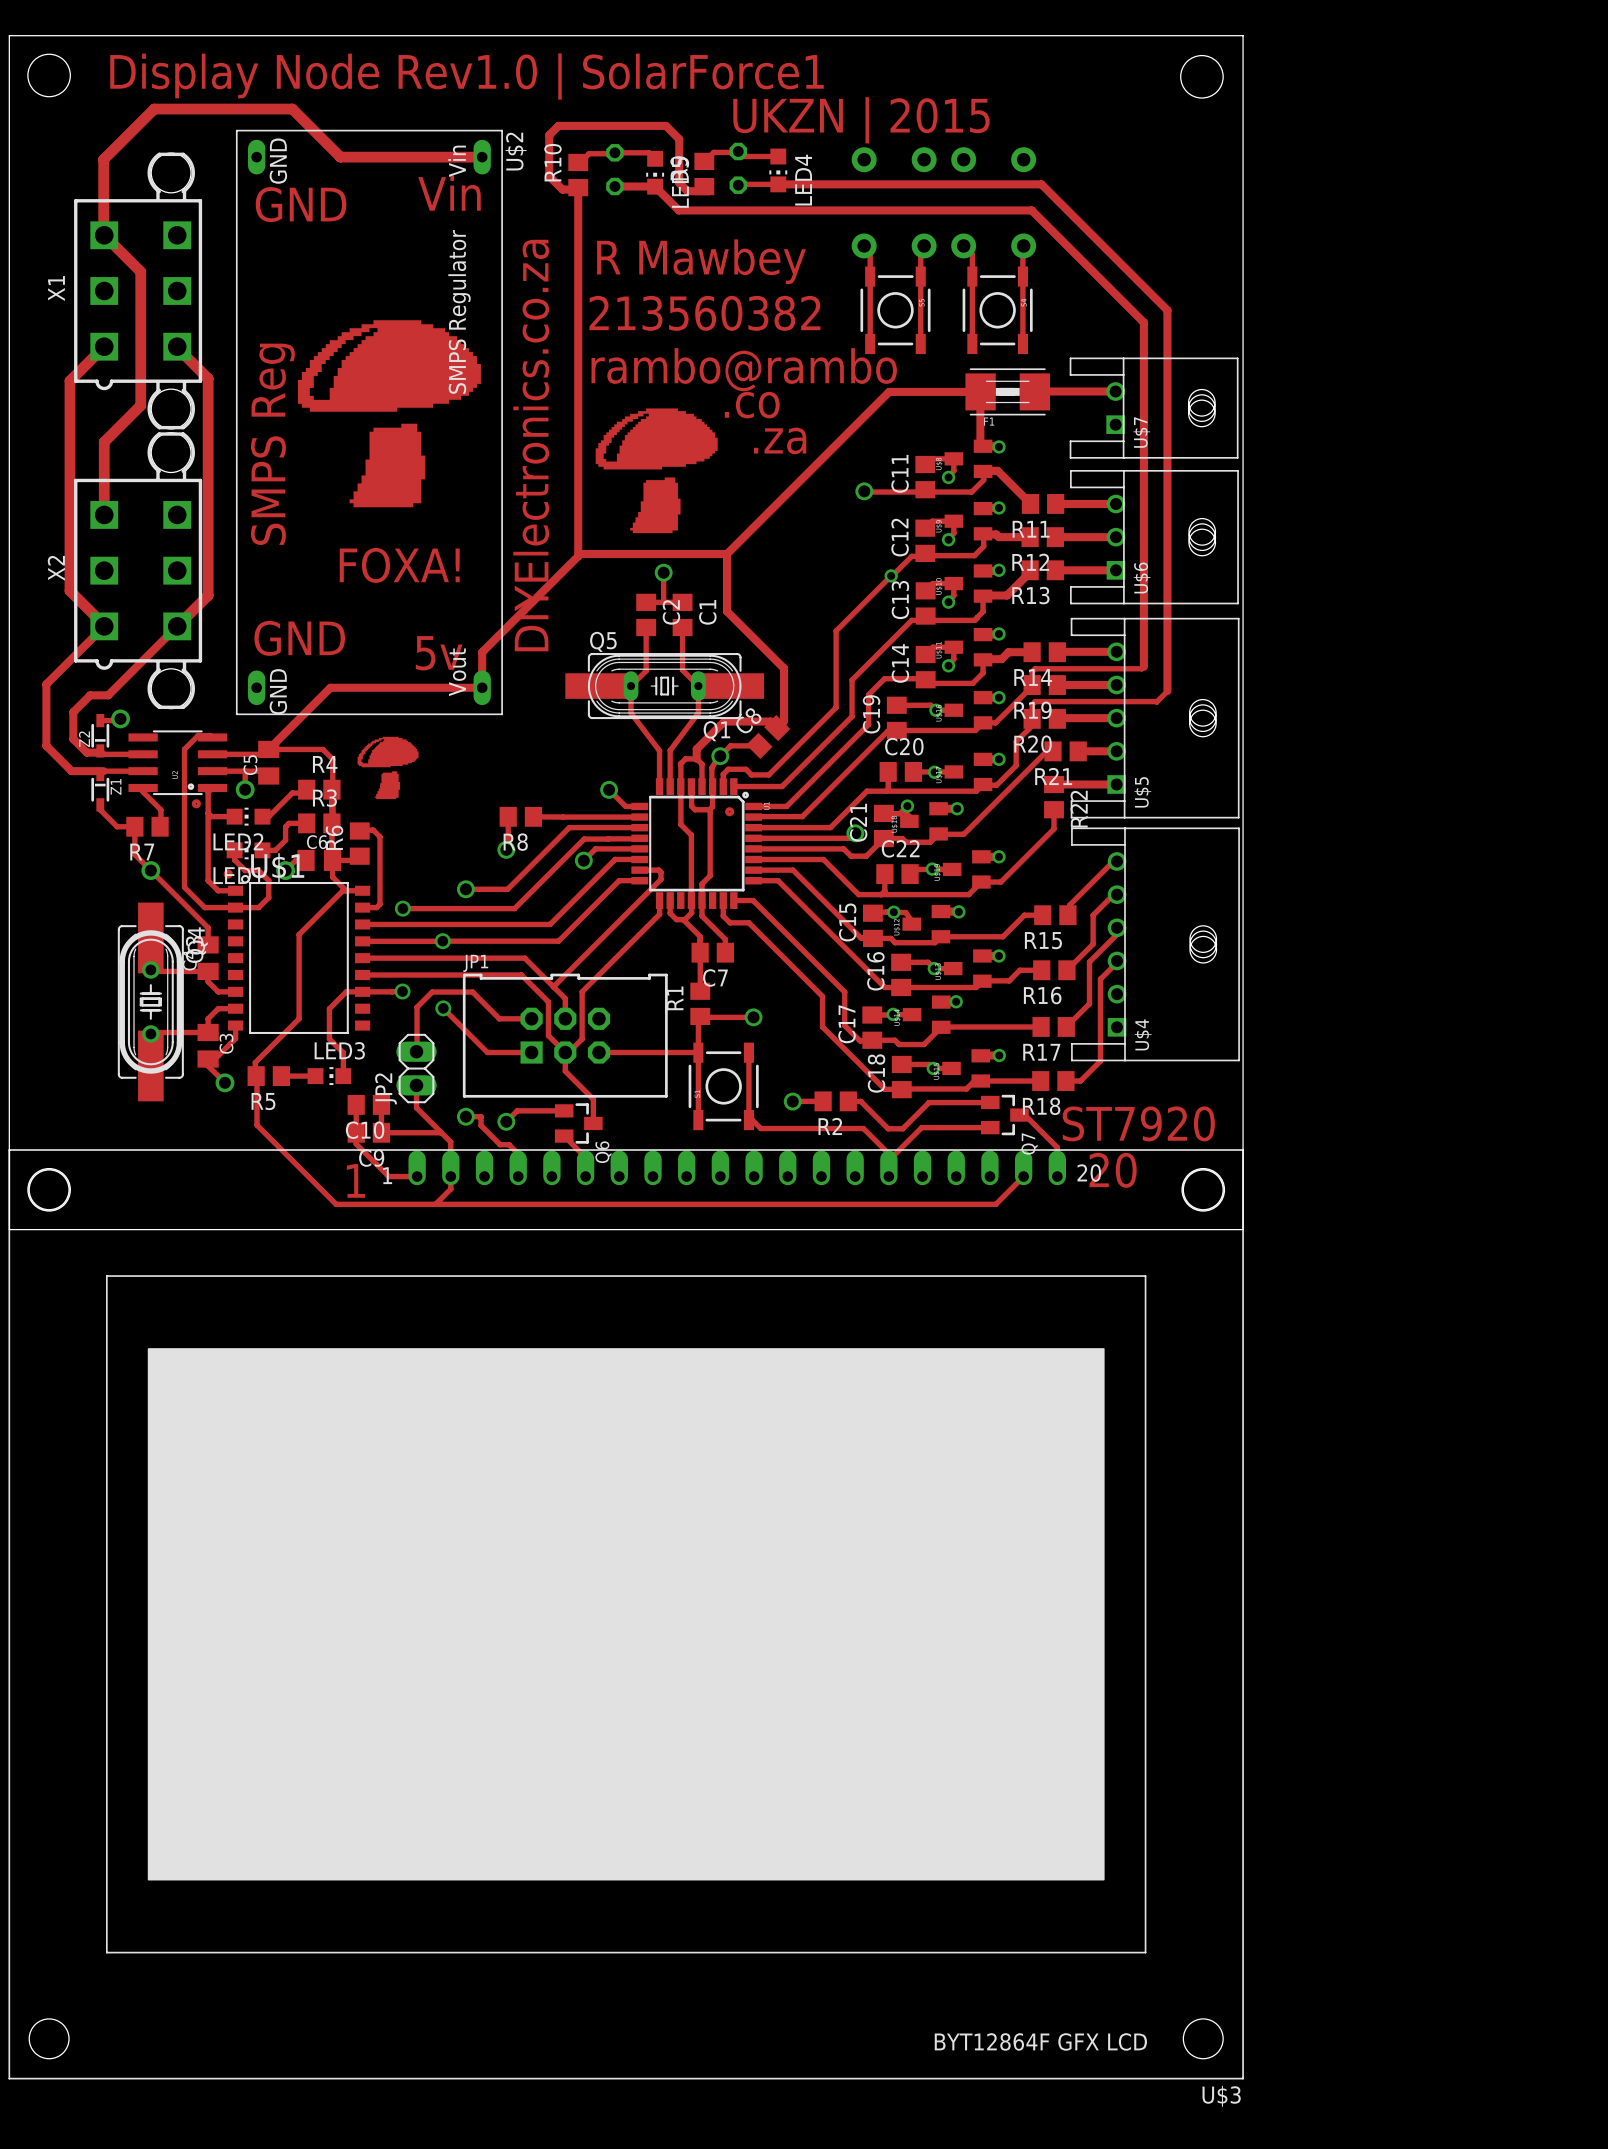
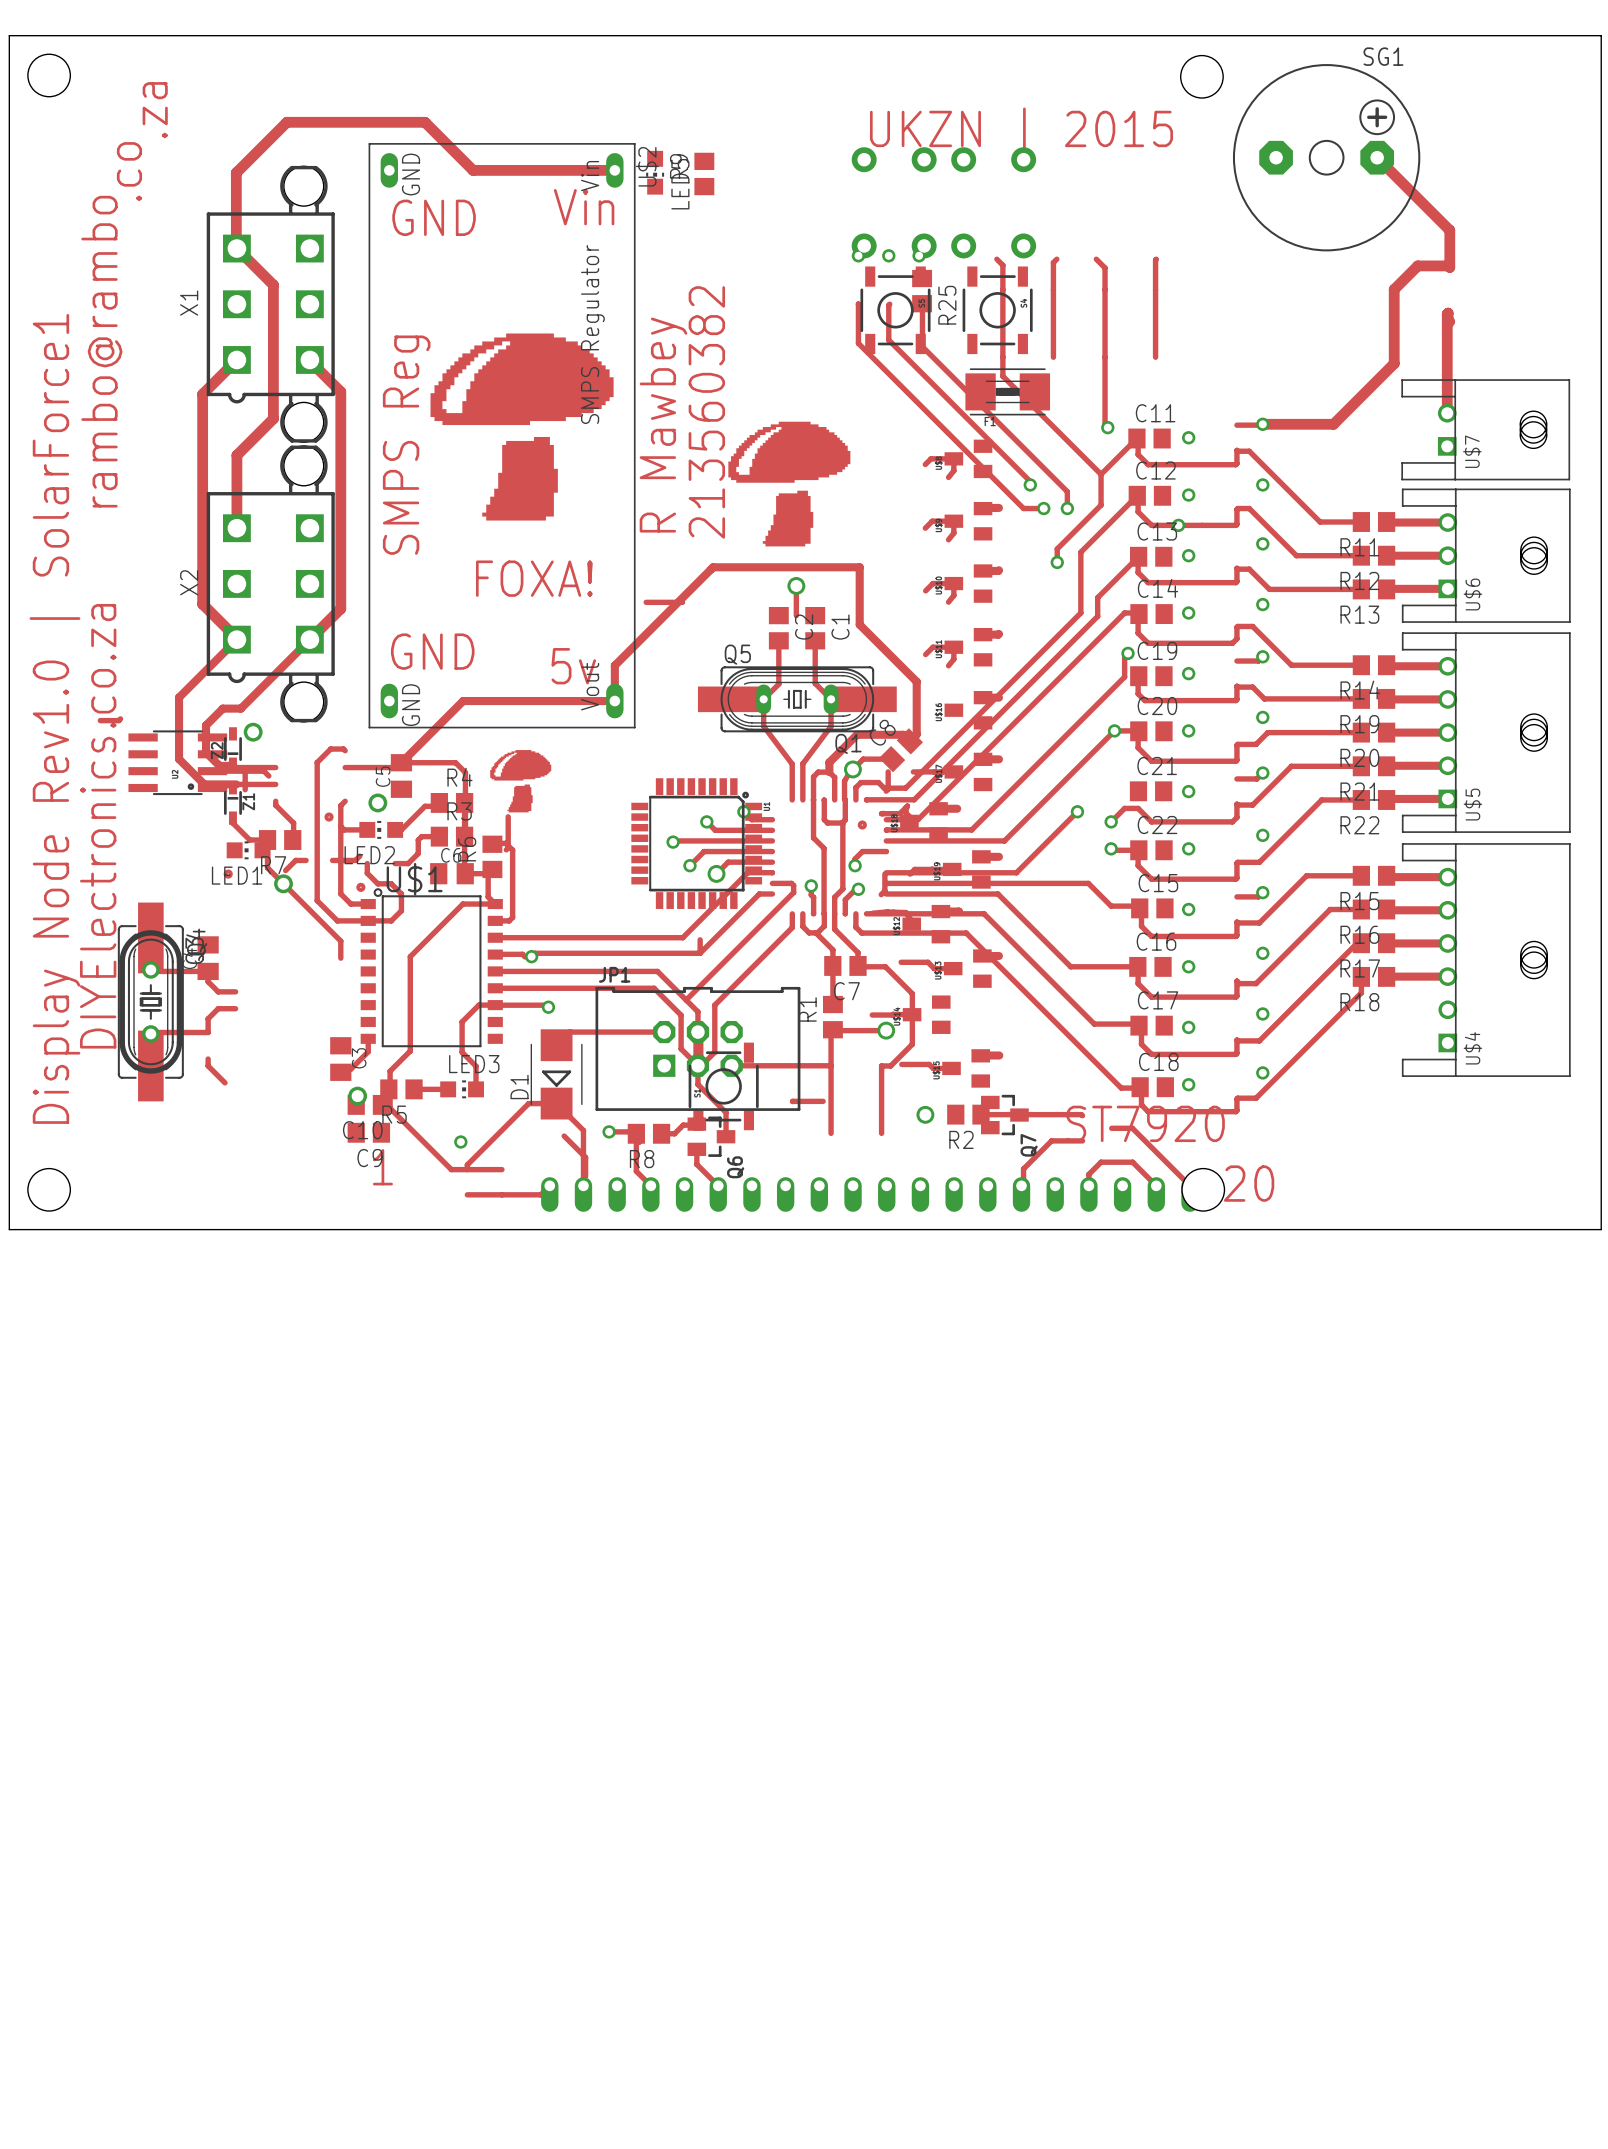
board edge: (1243, 35) (1243, 1229) -> (1243, 35) (1601, 35) (1601, 1229) (1243, 1229)
text: Display Node Rev1.0 | SolarForce1 (467, 76) -> none
text: none -> .za (155, 110)
text position: UKZN | 2015 (861, 120) -> UKZN | 2015 (1021, 132)
track: (778, 156) (743, 156) (738, 151) (713, 152) (704, 161) -> none
track: (482, 157) (340, 157) (292, 109) (154, 109) (103, 159) (103, 234) (140, 271) (140, 405) (104, 442) (104, 514) -> (614, 170) (473, 170) (425, 122) (286, 122) (236, 172) (236, 247) (273, 285) (273, 418) (236, 455) (236, 528)
SG1: none -> (1326, 157)
track: none -> (1377, 157) (1449, 230) (1449, 267) (1417, 265) (1394, 289) (1394, 363) (1333, 424) (1236, 425)
track: (655, 158) (649, 152) (589, 153) (578, 162) -> none
part: (738, 168) -> none
part: (614, 169) -> none
LED4: (778, 170) -> none
text: none -> .co (129, 171)
R10: (578, 175) -> none
track: (739, 184) (1041, 184) (1167, 310) (1167, 691) (1156, 701) (1035, 701) (1032, 704) (1032, 725) (1016, 741) (1016, 765) (996, 785) (983, 784) (976, 791) (866, 791) (830, 827) (753, 827) -> none
track: (614, 186) (654, 186) (678, 210) (1031, 210) (1143, 322) (1143, 666) (1141, 668) (1035, 668) (1032, 671) (1032, 686) (995, 722) (983, 722) (975, 730) (887, 731) (802, 816) (753, 817) -> none
track: (704, 186) (708, 191) (687, 191) (679, 182) (679, 139) (665, 125) (558, 125) (549, 135) (549, 176) (562, 189) (576, 189) (578, 187) (578, 556) -> none
text position: Vin (449, 193) -> Vin (584, 207)
text position: GND (301, 204) -> GND (434, 217)
track: (864, 245) (870, 252) (870, 343) -> none
track: (924, 245) (920, 249) (920, 343) -> (1056, 259) (1053, 262) (1053, 357)
track: (963, 245) (972, 254) (972, 343) -> none
track: (1023, 245) (1022, 343) -> (1156, 259) (1155, 357)
via: none -> (858, 255)
via: none -> (888, 255)
via: none -> (919, 255)
track: none -> (996, 259) (1002, 265) (1002, 376) (1101, 474)
track: none -> (1096, 259) (1105, 267) (1105, 424) (1107, 427)
text rotation: 0° (701, 261) -> 90° counterclockwise (663, 425)
X1 position: (138, 290) -> (270, 304)
R25: none -> (922, 291)
track: none -> (922, 303) (922, 346) (1067, 491) (1067, 508)
track: none -> (858, 304) (858, 343) (1023, 508) (1043, 508)
track: none -> (889, 304) (888, 340) (1030, 481) (1030, 484)
text rotation: 0° (704, 313) -> 90° counterclockwise (706, 412)
track: none -> (1449, 321) (1448, 313) (1447, 413)
drawing position: (397, 322) -> (530, 335)
drawing: [297, 324, 481, 508] -> none
drawing position: (411, 334) -> (543, 347)
drawing: none -> [430, 337, 614, 521]
drawing position: (411, 338) -> (543, 351)
drawing position: (411, 342) -> (543, 355)
track: (104, 346) (69, 380) (69, 590) (104, 626) (46, 684) (46, 745) (71, 771) (103, 771) -> (236, 359) (202, 394) (202, 604) (236, 639) (179, 697) (179, 759) (204, 784) (236, 784)
track: (177, 346) (208, 378) (208, 595) (108, 695) (90, 695) (73, 712) (73, 739) (86, 752) (100, 750) (103, 754) (143, 754) -> (309, 359) (340, 391) (340, 608) (240, 708) (222, 708) (206, 725) (206, 752) (219, 765) (232, 764) (236, 767) (275, 767)
drawing position: (411, 346) -> (543, 359)
drawing position: (411, 350) -> (543, 363)
drawing position: (411, 354) -> (543, 367)
text: none -> rambo@rambo (101, 351)
drawing position: (409, 362) -> (541, 375)
text: rambo@rambo (744, 369) -> none
track: (1115, 391) (1034, 391) -> none
drawing position: (373, 401) -> (506, 415)
text: .co (752, 405) -> none
U$7 position: (1154, 408) -> (1485, 429)
drawing position: (353, 409) -> (486, 423)
drawing position: (662, 409) -> (794, 423)
drawing: [595, 411, 718, 534] -> none
drawing position: (671, 417) -> (803, 431)
drawing position: (671, 420) -> (803, 433)
U$2 position: (369, 422) -> (502, 435)
drawing position: (671, 423) -> (803, 436)
drawing: none -> [728, 424, 851, 547]
via: none -> (1262, 424)
drawing position: (671, 425) -> (803, 438)
via: none -> (1107, 427)
drawing position: (671, 428) -> (803, 441)
drawing position: (395, 429) -> (528, 442)
drawing position: (671, 431) -> (803, 444)
drawing position: (669, 436) -> (802, 449)
via: none -> (1188, 437)
text: .za (780, 440) -> none
text position: SMPS Reg (272, 444) -> SMPS Reg (406, 445)
text: DIYElectronics.co.za (531, 445) -> none
track: (998, 446) (983, 446) (980, 443) (980, 391) (889, 391) (727, 554) -> none
via: (998, 446) -> none
drawing position: (397, 457) -> (530, 470)
drawing position: (646, 462) -> (778, 476)
drawing position: (632, 468) -> (765, 481)
track: none -> (1101, 474) (1101, 505) (1057, 548) (1057, 562)
track: none -> (1101, 474) (1136, 438) (1138, 454) (1148, 464) (1235, 464) (1236, 450) (1249, 451) (1320, 522) (1361, 522)
C11 rotation: 0° (925, 477) -> 90° clockwise (1149, 438)
C11 position: (925, 477) -> (1149, 438)
via: (948, 477) -> none
drawing position: (660, 481) -> (793, 494)
via: none -> (1030, 484)
via: none -> (1262, 484)
track: (864, 491) (971, 492) (983, 480) (983, 470) (997, 470) (1030, 503) -> none
via: (864, 491) -> none
via: none -> (1188, 495)
drawing position: (662, 499) -> (794, 513)
R11 position: (1043, 503) -> (1373, 522)
track: (1055, 504) (1115, 504) -> none
via: (998, 507) -> none
via: none -> (1043, 508)
via: none -> (1067, 508)
track: none -> (1386, 522) (1447, 522)
via: none -> (1178, 525)
track: (983, 534) (983, 546) (974, 555) (919, 556) -> none
track: (983, 534) (996, 534) (998, 537) (1030, 537) -> none
R12 position: (1042, 537) -> (1373, 555)
track: (1055, 537) (1115, 537) -> none
U$6 position: (1154, 537) -> (1486, 555)
via: (948, 539) -> none
C12 rotation: 0° (925, 540) -> 90° clockwise (1149, 495)
C12 position: (925, 540) -> (1149, 495)
via: none -> (1262, 543)
track: (925, 553) (922, 556) (911, 556) (891, 575) -> none
track: (727, 554) (580, 554) (482, 652) (482, 687) (330, 687) (268, 749) -> none
track: (727, 554) (727, 611) (784, 668) (784, 721) (777, 728) (770, 721) (724, 721) (696, 749) (696, 758) -> none
via: none -> (1188, 555)
track: none -> (1361, 555) (1296, 555) (1249, 508) (1236, 509) (1235, 525) (1151, 525) (1138, 511) (1137, 495) (1080, 552) (1080, 612) (905, 788) (884, 788) (878, 782) (860, 782) (855, 787) (855, 799)
track: none -> (1386, 555) (1447, 555)
track: none -> (1138, 556) (1097, 597) (1097, 616) (914, 799) (866, 799)
track: none -> (1138, 557) (1138, 572) (1148, 582) (1235, 582) (1236, 568) (1249, 569) (1269, 589) (1361, 589)
via: none -> (1057, 562)
text position: FOXA! (399, 565) -> FOXA! (534, 578)
X2 position: (138, 570) -> (270, 583)
via: (998, 570) -> none
track: (1030, 570) (1006, 595) (983, 595) (983, 611) (974, 620) (911, 620) (852, 680) (852, 716) (782, 786) (733, 786) -> none
R13 position: (1042, 570) -> (1373, 589)
track: (1055, 570) (1115, 570) -> none
track: (663, 572) (663, 602) -> (796, 585) (796, 615)
via: (663, 572) -> none
track: (891, 575) (836, 630) (836, 707) (768, 774) (751, 774) (745, 769) (728, 769) (723, 774) (723, 786) -> none
via: (891, 575) -> none
via: none -> (796, 585)
track: none -> (1447, 588) (1386, 589)
via: (948, 602) -> none
C13 rotation: 0° (925, 603) -> 90° clockwise (1151, 556)
C13 position: (925, 603) -> (1151, 556)
via: none -> (1262, 604)
via: none -> (1188, 612)
C2 position: (646, 614) -> (778, 628)
C1 position: (682, 614) -> (815, 628)
track: (646, 627) (646, 670) (631, 686) -> (778, 640) (778, 684) (763, 699)
track: (682, 627) (682, 670) (698, 686) -> (815, 640) (815, 683) (831, 699)
via: (998, 633) -> none
text position: GND (299, 638) -> GND (432, 651)
track: (1056, 651) (1116, 651) -> none
track: (1032, 652) (1008, 652) (1001, 659) (983, 659) (983, 673) (972, 683) (932, 683) (924, 678) (884, 678) (868, 694) (868, 724) (786, 806) (753, 806) -> none
R14 position: (1044, 652) -> (1373, 665)
text position: 5v (439, 653) -> 5v (573, 666)
track: none -> (1128, 653) (1124, 656) (1124, 677) (971, 829) (886, 830)
via: none -> (1128, 653)
track: none -> (1262, 656) (1258, 661) (1236, 661)
via: none -> (1262, 656)
via: (948, 665) -> none
track: none -> (1361, 665) (1291, 665) (1252, 626) (1237, 626) (1236, 638) (1232, 643) (1148, 643) (1138, 633) (1138, 614) (1124, 612) (917, 819) (886, 819)
track: none -> (1386, 665) (1447, 666)
C14 rotation: 0° (925, 667) -> 90° clockwise (1151, 614)
C14 position: (925, 667) -> (1151, 614)
via: none -> (1188, 673)
track: none -> (1138, 676) (1138, 693) (1144, 700) (1235, 700) (1236, 686) (1252, 687) (1264, 698) (1361, 698)
R19 position: (1044, 685) -> (1373, 698)
track: (1057, 685) (1116, 685) -> none
track: (631, 686) (631, 713) (659, 750) (659, 786) -> (763, 699) (763, 726) (792, 764) (792, 799)
Q1 position: (664, 686) -> (797, 699)
Q5 position: (664, 686) -> (797, 699)
track: (698, 686) (698, 713) (670, 750) (670, 786) -> (831, 699) (831, 726) (802, 763) (802, 799)
via: (998, 697) -> none
track: none -> (1386, 698) (1447, 699)
track: (896, 705) (930, 705) (935, 710) (953, 710) -> none
via: (935, 710) -> none
C19 rotation: 0° (896, 717) -> 90° clockwise (1151, 676)
C19 position: (896, 717) -> (1151, 676)
via: none -> (1262, 717)
via: (120, 718) -> none
R20 position: (1044, 718) -> (1373, 732)
track: (1116, 718) (1057, 718) -> none
U$5 position: (1155, 718) -> (1486, 732)
via: none -> (1114, 730)
via: none -> (1188, 730)
via: none -> (253, 732)
track: none -> (1361, 732) (1267, 732) (1256, 744) (1237, 744) (1235, 761) (1151, 761) (1138, 747) (1138, 730) (1114, 730) (1004, 840) (886, 840)
track: none -> (1386, 732) (1447, 732)
Z2 position: (100, 735) -> (232, 749)
C8 position: (768, 736) -> (900, 750)
track: (212, 737) (198, 735) (184, 749) (184, 887) (204, 907) (258, 907) (268, 897) (268, 880) (258, 870) (245, 870) (234, 859) (234, 850) -> (345, 750) (330, 749) (317, 762) (317, 900) (337, 920) (391, 920) (401, 910) (401, 893) (391, 883) (377, 883) (367, 873) (367, 863)
drawing position: (390, 737) -> (523, 750)
drawing: [357, 738, 419, 800] -> none
drawing position: (395, 741) -> (528, 754)
drawing position: (395, 742) -> (528, 756)
drawing position: (395, 744) -> (528, 757)
drawing position: (395, 745) -> (528, 758)
track: (759, 745) (730, 745) (718, 756) (711, 767) (712, 806) (709, 809) -> (892, 759) (863, 759) (851, 769) (844, 781) (845, 819) (842, 823)
drawing position: (395, 746) -> (528, 759)
drawing position: (395, 748) -> (528, 761)
track: (268, 749) (263, 754) (212, 754) -> (401, 762) (396, 767) (345, 767)
track: (268, 749) (322, 749) (332, 759) (332, 877) (346, 890) -> none
drawing position: (394, 750) -> (527, 763)
drawing: none -> [490, 751, 552, 813]
track: (1053, 751) (1046, 751) (963, 834) (938, 833) (930, 842) (906, 842) (902, 838) (883, 838) (866, 856) (851, 856) (843, 848) (753, 848) -> none
R21 position: (1065, 751) -> (1373, 766)
track: (1078, 751) (1116, 751) -> none
via: (720, 756) -> none
track: (696, 758) (685, 758) (680, 763) (680, 786) -> (829, 772) (818, 772) (813, 776) (813, 799)
track: (696, 758) (702, 764) (702, 786) -> (829, 772) (834, 777) (834, 799)
via: (998, 759) -> none
C5 position: (268, 762) -> (401, 775)
track: none -> (401, 762) (455, 762) (465, 772) (464, 873) (488, 873)
track: none -> (401, 762) (463, 701) (614, 701) (614, 665) (713, 567) (859, 567) (859, 624) (916, 681) (916, 734) (909, 741) (903, 734) (857, 734) (829, 762) (829, 772)
drawing position: (382, 763) -> (515, 777)
track: none -> (1447, 765) (1386, 766)
drawing position: (376, 766) -> (508, 779)
track: none -> (1361, 766) (1291, 766) (1252, 805) (1236, 804) (1236, 817) (1232, 821) (1151, 821) (1138, 808) (1124, 808) (1111, 821)
text: none -> Display Node Rev1.0 | SolarForce1 (54, 718)
track: (103, 771) (143, 771) -> (236, 784) (275, 784)
C20 position: (900, 771) -> (1151, 731)
via: (934, 772) -> none
drawing position: (390, 773) -> (522, 786)
track: none -> (1262, 773) (1256, 778) (1236, 778)
via: none -> (1262, 773)
drawing position: (390, 782) -> (523, 795)
track: (1054, 784) (1116, 784) -> none
track: (680, 786) (680, 824) (691, 835) (691, 912) (684, 919) (676, 919) (670, 913) (670, 900) -> (813, 800) (813, 837) (824, 848) (824, 926) (817, 932) (809, 932) (802, 926) (802, 913)
track: (691, 786) (691, 806) (695, 809) (709, 809) -> (824, 799) (824, 819) (827, 823) (842, 823)
track: (143, 788) (143, 792) (160, 809) (160, 826) -> (275, 801) (275, 805) (293, 823) (292, 840)
track: (212, 788) (208, 792) (208, 880) (218, 890) (235, 890) -> (345, 801) (340, 805) (340, 893) (350, 904) (368, 904)
Z1 position: (100, 789) -> (232, 802)
via: (245, 789) -> none
track: (306, 789) (303, 793) (292, 793) (268, 816) (262, 816) -> (439, 802) (436, 806) (425, 806) (401, 829) (395, 829)
R4 position: (319, 789) -> (451, 802)
track: (609, 789) (625, 806) (639, 806) -> none
via: (609, 789) -> none
via: none -> (1188, 791)
R22 rotation: 0° (1054, 797) -> 90° clockwise (1373, 799)
R22 position: (1054, 797) -> (1373, 799)
track: none -> (1447, 798) (1386, 799)
drawing: [191, 799, 201, 809] -> none
track: none -> (1361, 799) (1321, 799) (1259, 862) (1237, 862) (1235, 879) (1151, 879) (1138, 865) (1138, 850) (1111, 848)
via: none -> (377, 802)
track: (100, 804) (100, 809) (117, 826) (134, 826) (134, 854) (208, 927) (208, 944) -> (232, 818) (232, 823) (249, 840) (267, 840) (267, 867) (340, 941) (340, 958)
text: none -> DIYElectronics.co.za (98, 826)
via: (907, 806) -> none
via: (957, 808) -> none
track: (709, 809) (710, 875) (702, 883) (702, 916) (725, 939) (725, 952) -> none
track: (1054, 809) (1054, 828) (1000, 882) (981, 882) (968, 894) (858, 894) (823, 859) (753, 859) -> none
drawing position: (729, 811) -> (862, 825)
track: none -> (743, 811) (751, 819) (772, 819)
via: none -> (743, 811)
track: none -> (1077, 811) (1016, 872) (886, 872)
via: none -> (1077, 811)
drawing: none -> [324, 812, 334, 822]
track: (208, 813) (211, 816) (234, 816) -> (340, 826) (344, 829) (367, 829)
LED2 position: (248, 816) -> (381, 829)
R8 position: (520, 816) -> (648, 1133)
track: (533, 816) (639, 817) -> none
track: none -> (706, 821) (715, 830) (772, 830)
via: none -> (706, 821)
via: none -> (1111, 821)
track: (306, 823) (289, 823) (285, 826) (285, 840) (275, 850) (262, 850) -> (439, 836) (421, 836) (418, 840) (418, 853) (408, 863) (395, 863)
R3 position: (319, 823) -> (451, 836)
track: none -> (842, 823) (842, 889) (834, 897) (834, 929) (858, 952) (858, 966) (885, 966) (912, 993) (912, 1044) (890, 1065) (881, 1065) (881, 1133)
C21 rotation: 0° (883, 825) -> 90° clockwise (1151, 791)
C21 position: (883, 825) -> (1151, 791)
R7 position: (147, 826) -> (280, 840)
track: (639, 827) (569, 827) (507, 889) (465, 889) -> none
track: (359, 830) (373, 830) (379, 836) (379, 904) (376, 907) (362, 907) -> (492, 844) (505, 843) (512, 850) (512, 917) (509, 920) (495, 920)
track: (855, 833) (850, 838) (753, 838) -> none
via position: (855, 833) -> (852, 769)
via: none -> (1262, 835)
track: (639, 838) (584, 839) (514, 908) (402, 908) -> none
track: none -> (772, 840) (673, 842)
via: none -> (673, 842)
R6 position: (359, 843) -> (492, 856)
track: (639, 848) (595, 848) (583, 860) -> (772, 862) (728, 862) (716, 873)
via: none -> (1111, 848)
via: none -> (1188, 848)
via: (506, 849) -> none
track: none -> (772, 851) (704, 851) (689, 865)
track: none -> (886, 851) (862, 851) (855, 858) (855, 865)
via: (998, 856) -> none
track: (639, 859) (615, 859) (550, 924) (362, 924) -> (772, 872) (747, 872) (682, 937) (495, 937)
C6 position: (319, 860) -> (451, 873)
via: (583, 860) -> none
track: (1117, 861) (1113, 861) (1069, 905) (1067, 915) -> none
via: none -> (689, 865)
via: none -> (855, 865)
via: (932, 869) -> none
via: (150, 870) -> none
via position: (285, 870) -> (283, 883)
track: (639, 870) (658, 870) (660, 872) (660, 879) (553, 986) -> (772, 883) (791, 883) (793, 885) (793, 892) (686, 1000)
track: (753, 870) (793, 870) (860, 938) (890, 938) (895, 942) (934, 942) (940, 936) (1002, 936) (1024, 915) (1042, 915) -> none
track: none -> (488, 873) (488, 896) (495, 904) (462, 904) (410, 956) (410, 1051) (390, 1071) (388, 1089) (390, 1108) (451, 1169) (501, 1169)
via: none -> (716, 873)
C22 position: (897, 874) -> (1151, 850)
track: none -> (1361, 875) (1306, 875) (1259, 922) (1236, 922) (1235, 936) (1151, 936) (1141, 926) (1141, 910) (1137, 906) (1111, 906) (1088, 883) (886, 883)
track: none -> (1386, 875) (1447, 877)
track: (639, 880) (619, 880) (558, 941) (442, 941) -> none
track: (753, 880) (778, 880) (884, 987) (976, 987) (982, 980) (1009, 980) (1019, 970) (1041, 970) -> none
drawing: none -> [356, 882, 366, 892]
track: none -> (811, 885) (813, 913)
via: none -> (811, 885)
via: (465, 889) -> none
track: none -> (858, 889) (855, 889) (845, 899) (845, 913)
via: none -> (858, 889)
track: (362, 890) (342, 890) (299, 934) (299, 1018) (255, 1062) (256, 1076) -> none
track: none -> (1262, 892) (1258, 896) (1236, 896)
via: none -> (1262, 892)
track: none -> (772, 894) (759, 894) (700, 953) (534, 953) (531, 956) (524, 956) (522, 954) (495, 954)
track: none -> (886, 894) (997, 894) (1070, 966) (1137, 966) (1138, 983) (1151, 997) (1235, 997) (1236, 981) (1239, 983) (1256, 983) (1330, 909) (1361, 909)
track: (1117, 894) (1113, 894) (1093, 915) (1093, 944) (1066, 970) -> none
track: (659, 900) (659, 914) (582, 991) (582, 1039) (568, 1052) (565, 1052) -> (792, 913) (792, 927) (714, 1005) (714, 1052) (701, 1065) (697, 1065)
track: (723, 900) (723, 916) (729, 922) (748, 922) (822, 996) (822, 1026) (884, 1089) (966, 1088) (974, 1081) (1040, 1081) -> none
track: (733, 900) (753, 900) (844, 992) (844, 1025) (860, 1040) (894, 1040) (899, 1044) (924, 1044) (941, 1026) (1041, 1026) -> none
via: (402, 908) -> none
via: none -> (1188, 909)
track: none -> (1386, 909) (1447, 910)
via: (958, 911) -> none
via: (893, 912) -> none
track: none -> (855, 913) (855, 927) (861, 933) (966, 933) (1121, 1088) (1140, 1087) (1141, 1104) (1148, 1111) (1235, 1111) (1237, 1098) (1256, 1098) (1361, 992) (1361, 976)
track: none -> (866, 913) (984, 913) (1094, 1024) (1137, 1024) (1141, 1028) (1141, 1044) (1151, 1054) (1235, 1054) (1236, 1040) (1259, 1040) (1357, 943) (1361, 943)
R15 position: (1055, 915) -> (1373, 875)
track: (683, 919) (700, 936) (700, 991) -> (815, 932) (832, 949) (832, 1004)
C15 rotation: 0° (872, 925) -> 90° clockwise (1152, 908)
C15 position: (872, 925) -> (1152, 908)
track: (1117, 927) (1117, 934) (1089, 961) (1089, 1003) (1066, 1026) -> none
track: (362, 941) (442, 941) -> none
via: (442, 941) -> none
track: none -> (1386, 943) (1447, 943)
U$4 position: (1155, 944) -> (1486, 960)
C7 position: (712, 952) -> (845, 965)
via: none -> (1262, 953)
U$1 position: (299, 954) -> (431, 967)
via: none -> (531, 956)
via: (998, 956) -> none
track: (362, 958) (524, 958) (565, 998) (565, 1018) -> (495, 971) (657, 971) (697, 1011) (697, 1032)
track: (1117, 960) (1100, 979) (1100, 1061) (1080, 1081) (1065, 1081) -> none
via: none -> (1188, 966)
via: (934, 968) -> none
R16 position: (1054, 970) -> (1373, 909)
C16 rotation: 0° (901, 974) -> 90° clockwise (1150, 966)
C16 position: (901, 974) -> (1150, 966)
track: (362, 975) (521, 975) (548, 1001) (548, 1035) (565, 1052) -> (495, 988) (654, 988) (681, 1015) (681, 1048) (697, 1065)
track: none -> (1386, 976) (1447, 976)
track: (402, 991) (346, 991) (329, 1008) (329, 1039) (343, 1052) (343, 1076) -> none
via: (402, 991) -> none
via: (956, 1001) -> none
R1 position: (700, 1003) -> (832, 1017)
track: none -> (548, 1007) (545, 1005) (478, 1005) (462, 1021) (462, 1052) (476, 1066) (476, 1089)
via: none -> (548, 1007)
track: (443, 1008) (487, 1052) (531, 1052) -> none
via: (443, 1008) -> none
via: none -> (1262, 1013)
via: (893, 1014) -> none
track: (753, 1017) (700, 1016) (698, 1018) (698, 1120) -> (886, 1030) (832, 1029) (831, 1031) (831, 1133)
via: (753, 1017) -> none
track: (531, 1018) (499, 1018) (472, 992) (432, 992) (417, 1007) (416, 1051) -> none
track: (235, 1025) (235, 1038) (218, 1055) (211, 1055) -> (368, 1038) (368, 1051) (350, 1069) (343, 1069)
R17 position: (1053, 1026) -> (1373, 943)
C17 rotation: 0° (872, 1027) -> 90° clockwise (1151, 1025)
C17 position: (872, 1027) -> (1151, 1025)
via: none -> (1188, 1027)
via: none -> (886, 1030)
track: none -> (664, 1032) (569, 1032) (556, 1045)
JP1 position: (565, 1035) -> (697, 1048)
C3 position: (208, 1045) -> (340, 1059)
track: (565, 1052) (565, 1071) (593, 1099) (593, 1123) -> (697, 1065) (697, 1084) (726, 1112) (726, 1136)
track: (598, 1052) (698, 1052) -> (731, 1065) (831, 1065)
track: (748, 1052) (748, 1120) (752, 1120) (760, 1128) (863, 1128) (888, 1153) (888, 1176) -> none
via: (999, 1055) -> none
JP2: (416, 1068) -> none
via: (933, 1068) -> none
track: (255, 1069) (256, 1071) (256, 1125) (336, 1204) (995, 1204) (1023, 1176) -> none
via: none -> (1262, 1072)
D1: none -> (556, 1074)
R5 position: (268, 1076) -> (401, 1089)
track: (281, 1076) (315, 1076) -> (414, 1089) (448, 1089)
LED3 position: (329, 1076) -> (462, 1089)
C18 rotation: 0° (901, 1077) -> 90° clockwise (1152, 1087)
C18 position: (901, 1077) -> (1152, 1087)
R18 position: (1053, 1081) -> (1373, 976)
via: (224, 1082) -> none
via: none -> (1188, 1084)
track: (416, 1085) (416, 1107) (450, 1142) (450, 1176) -> none
via: none -> (357, 1096)
via: (792, 1101) -> none
R2 position: (835, 1101) -> (968, 1114)
track: (848, 1101) (860, 1101) (888, 1128) (902, 1128) (928, 1102) (990, 1102) -> none
track: (356, 1104) (356, 1144) (388, 1176) (417, 1176) -> none
track: (381, 1104) (381, 1132) (440, 1132) -> none
track: (564, 1110) (517, 1110) (506, 1121) -> none
via: none -> (925, 1114)
track: none -> (980, 1114) (1082, 1115)
track: (1019, 1115) (1024, 1115) (1057, 1147) (1057, 1176) -> none
track: (465, 1116) (481, 1116) (481, 1125) (500, 1144) (509, 1144) (518, 1153) (518, 1176) -> none
via: (465, 1116) -> none
via: (506, 1121) -> none
Q6 position: (578, 1123) -> (711, 1136)
track: none -> (696, 1124) (683, 1125) (674, 1133) (661, 1133)
track: (990, 1127) (921, 1127) (888, 1160) -> none
track: none -> (1111, 1128) (1132, 1128) (1189, 1185)
track: none -> (609, 1131) (629, 1131) (639, 1142) (639, 1136) (636, 1133) (636, 1171) (650, 1185)
via: none -> (609, 1131)
track: none -> (1082, 1140) (1051, 1140) (1023, 1168) (1023, 1183) (1021, 1185)
via: none -> (460, 1142)
track: none -> (696, 1149) (696, 1164) (718, 1185)
track: none -> (467, 1169) (467, 1164) (528, 1103) (556, 1103) (583, 1130) (583, 1185)
text position: 20 (1113, 1170) -> 20 (1249, 1183)
track: (450, 1176) (450, 1189) (435, 1204) -> none
text position: 1 (355, 1180) -> 1 (382, 1167)
track: none -> (549, 1185) (540, 1194) (467, 1194)
track: none -> (1088, 1185) (1088, 1174) (1101, 1162) (1132, 1162) (1156, 1185)
part: none -> (869, 1194)
U$3: (626, 1614) -> none

